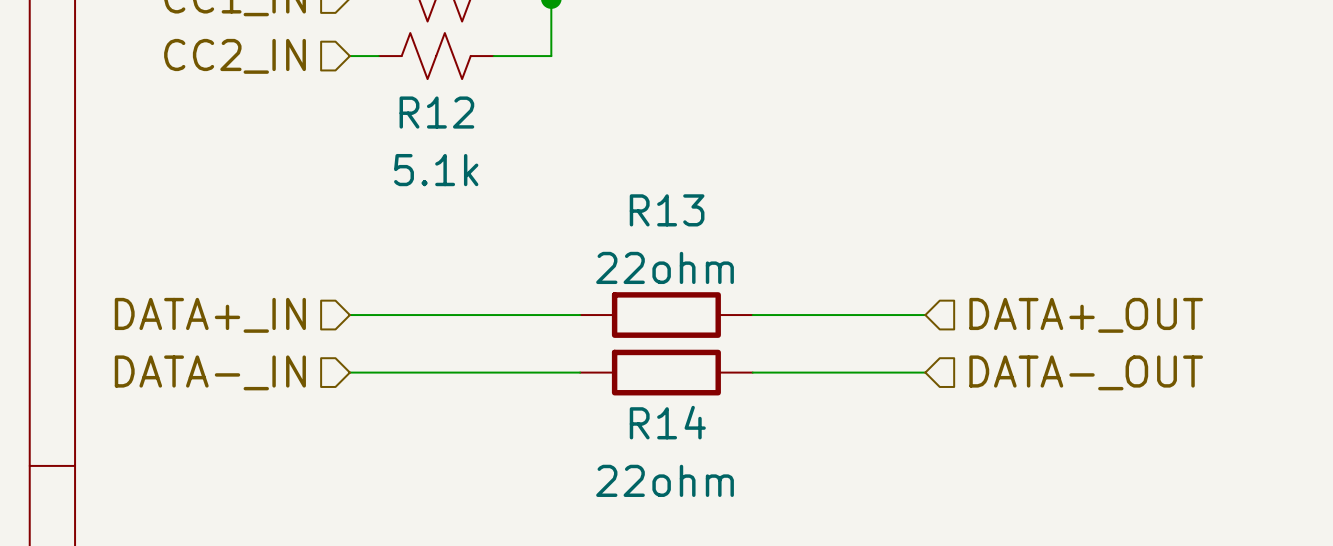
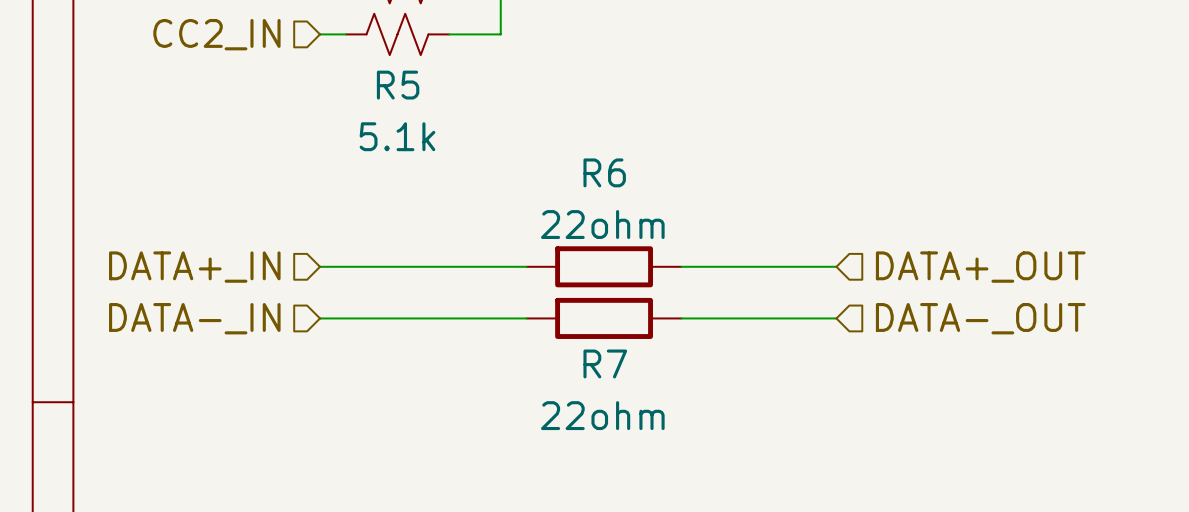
R12 name: R12 (436, 112) -> R5 (398, 85)
R13 name: R13 (667, 210) -> R6 (604, 172)
R14 name: R14 (667, 422) -> R7 (605, 363)

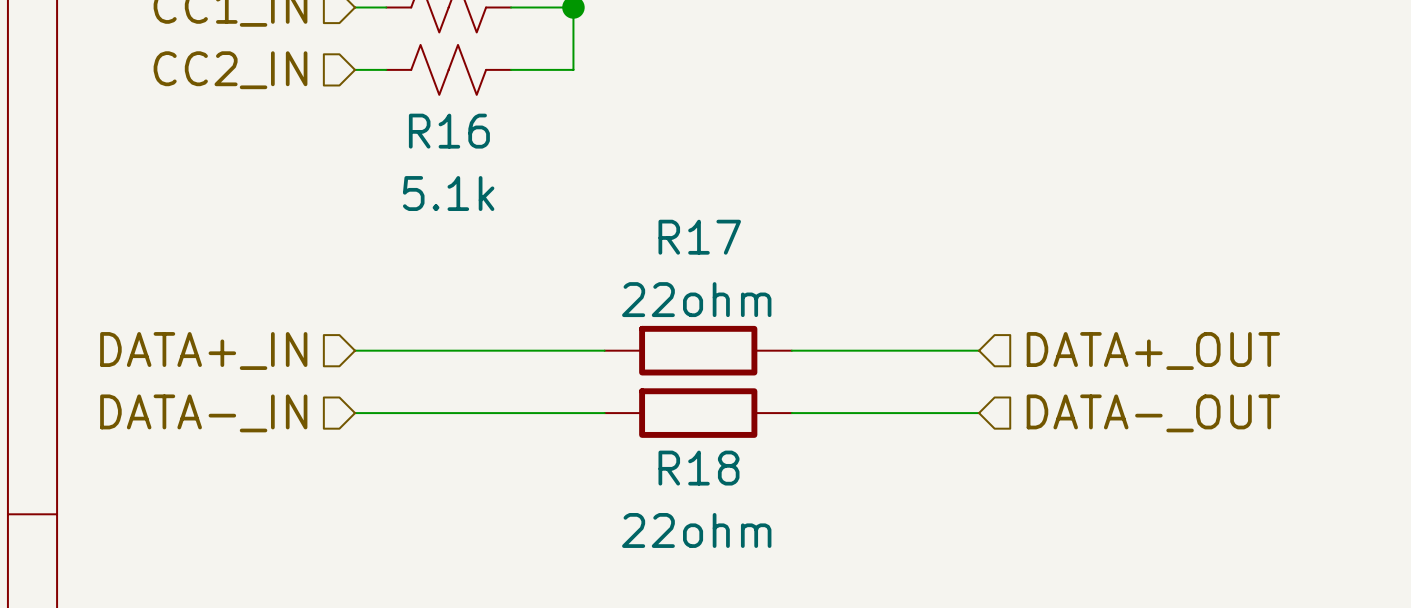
R5 name: R5 (398, 85) -> R16 (449, 131)
R6 name: R6 (604, 172) -> R17 (699, 237)
R7 name: R7 (605, 363) -> R18 (698, 468)

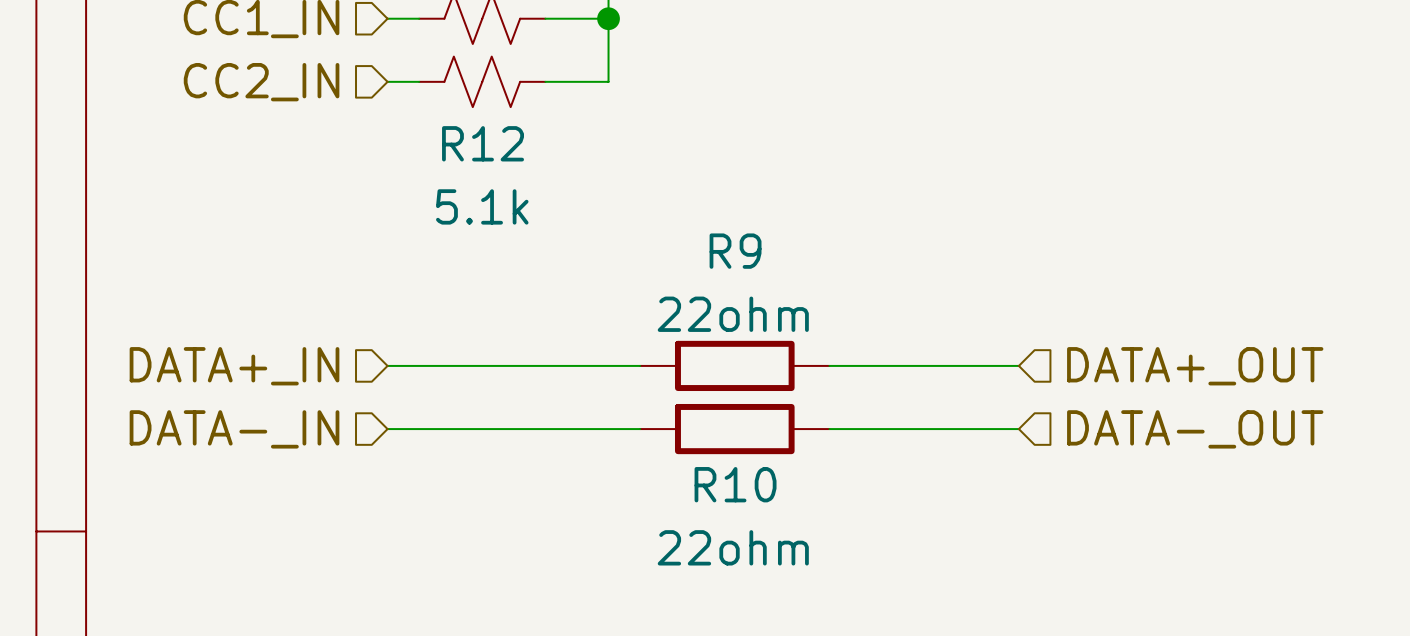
R16 name: R16 (449, 131) -> R12 (483, 143)
R17 name: R17 (699, 237) -> R9 (735, 251)
R18 name: R18 (698, 468) -> R10 (735, 484)

